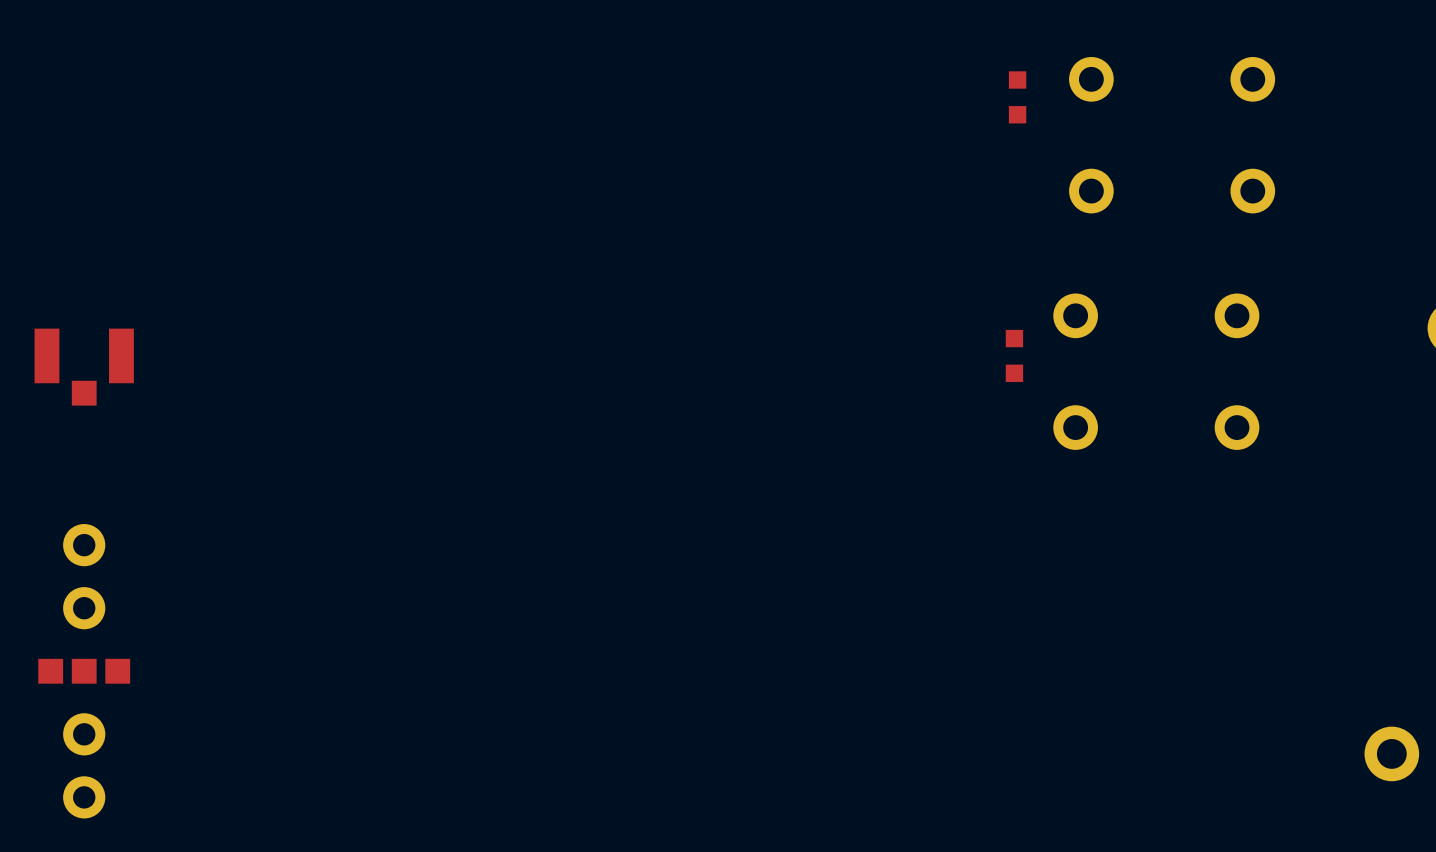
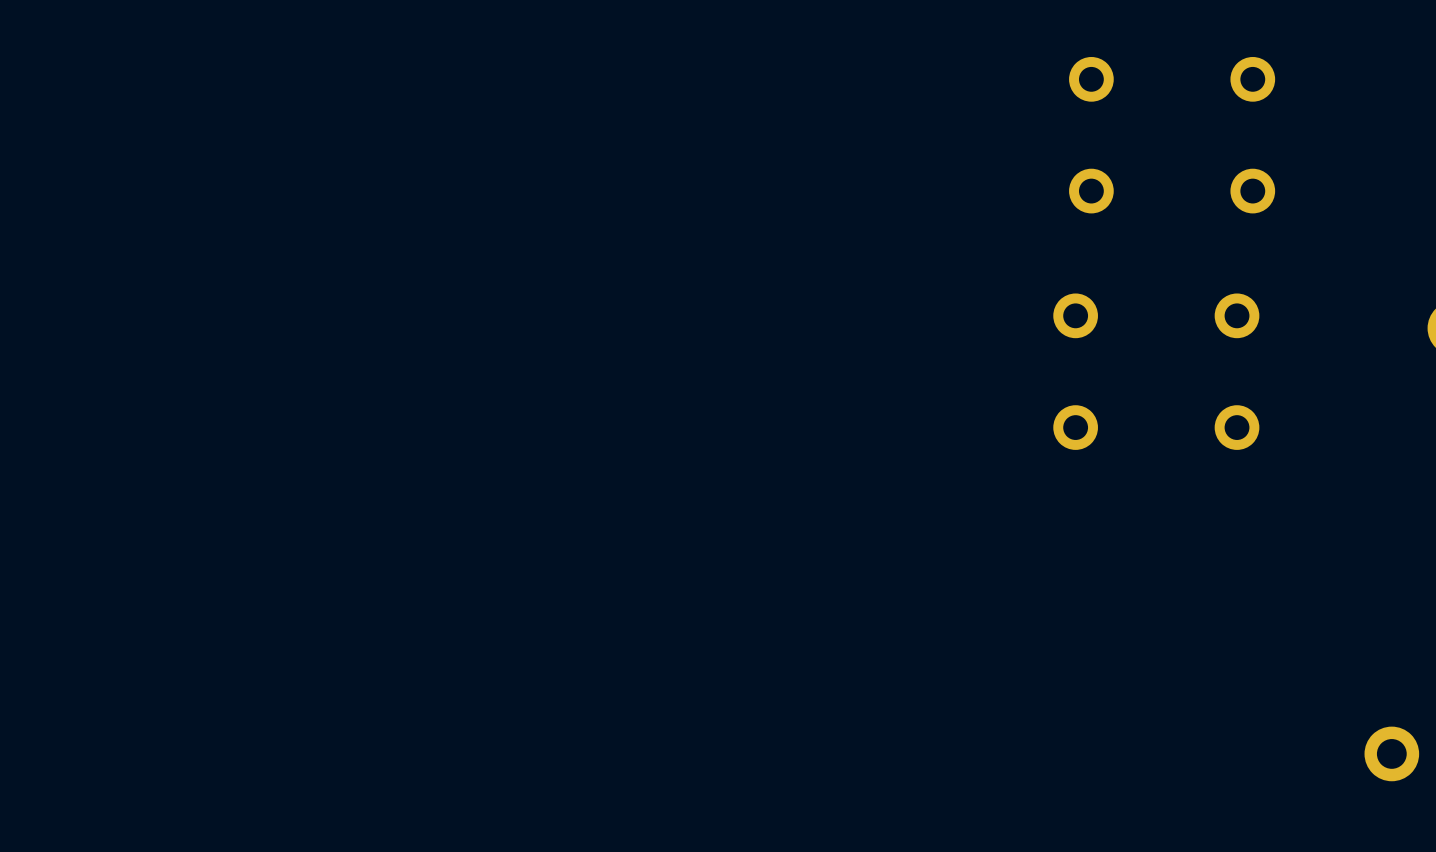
part: (1017, 97) -> none
part: (1014, 355) -> none
part: (84, 367) -> none
part: (84, 545) -> none
part: (84, 608) -> none
part: (84, 671) -> none
part: (84, 734) -> none
part: (84, 797) -> none

